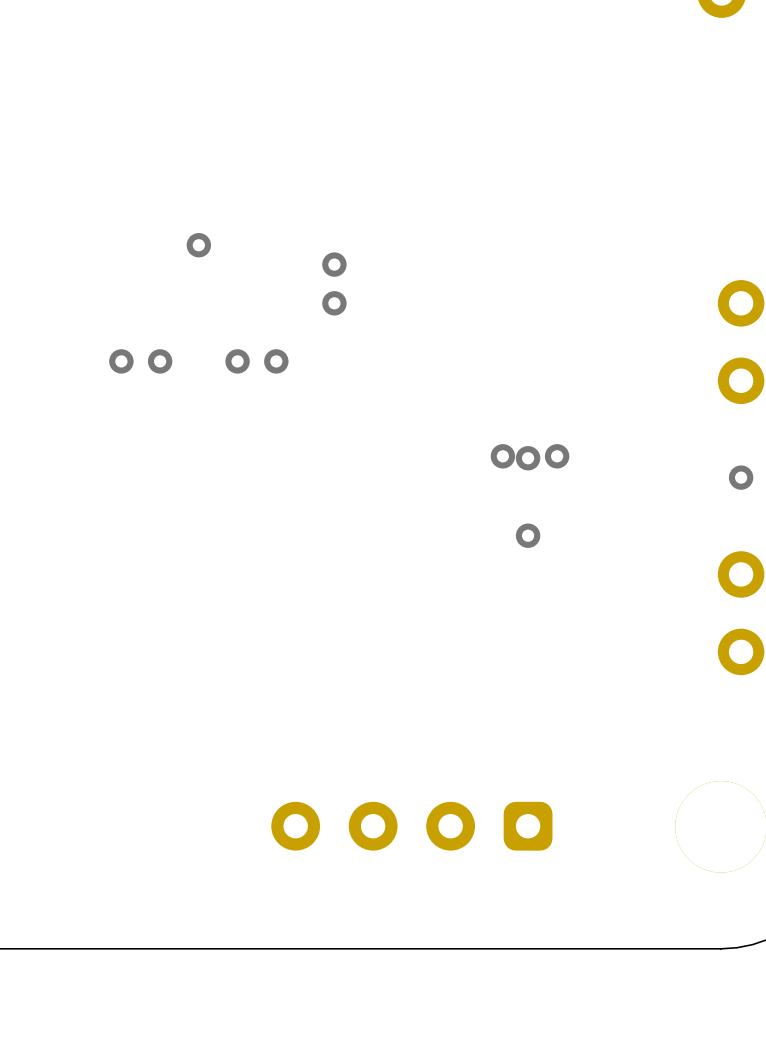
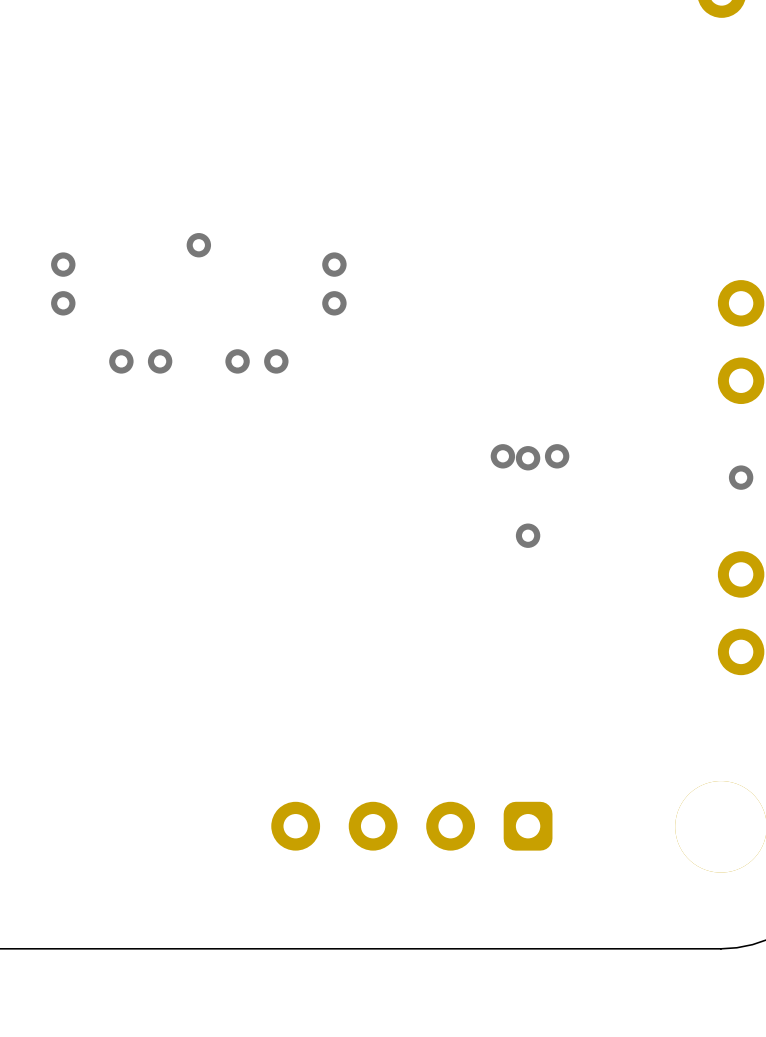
via: none -> (63, 264)
via: none -> (63, 303)

